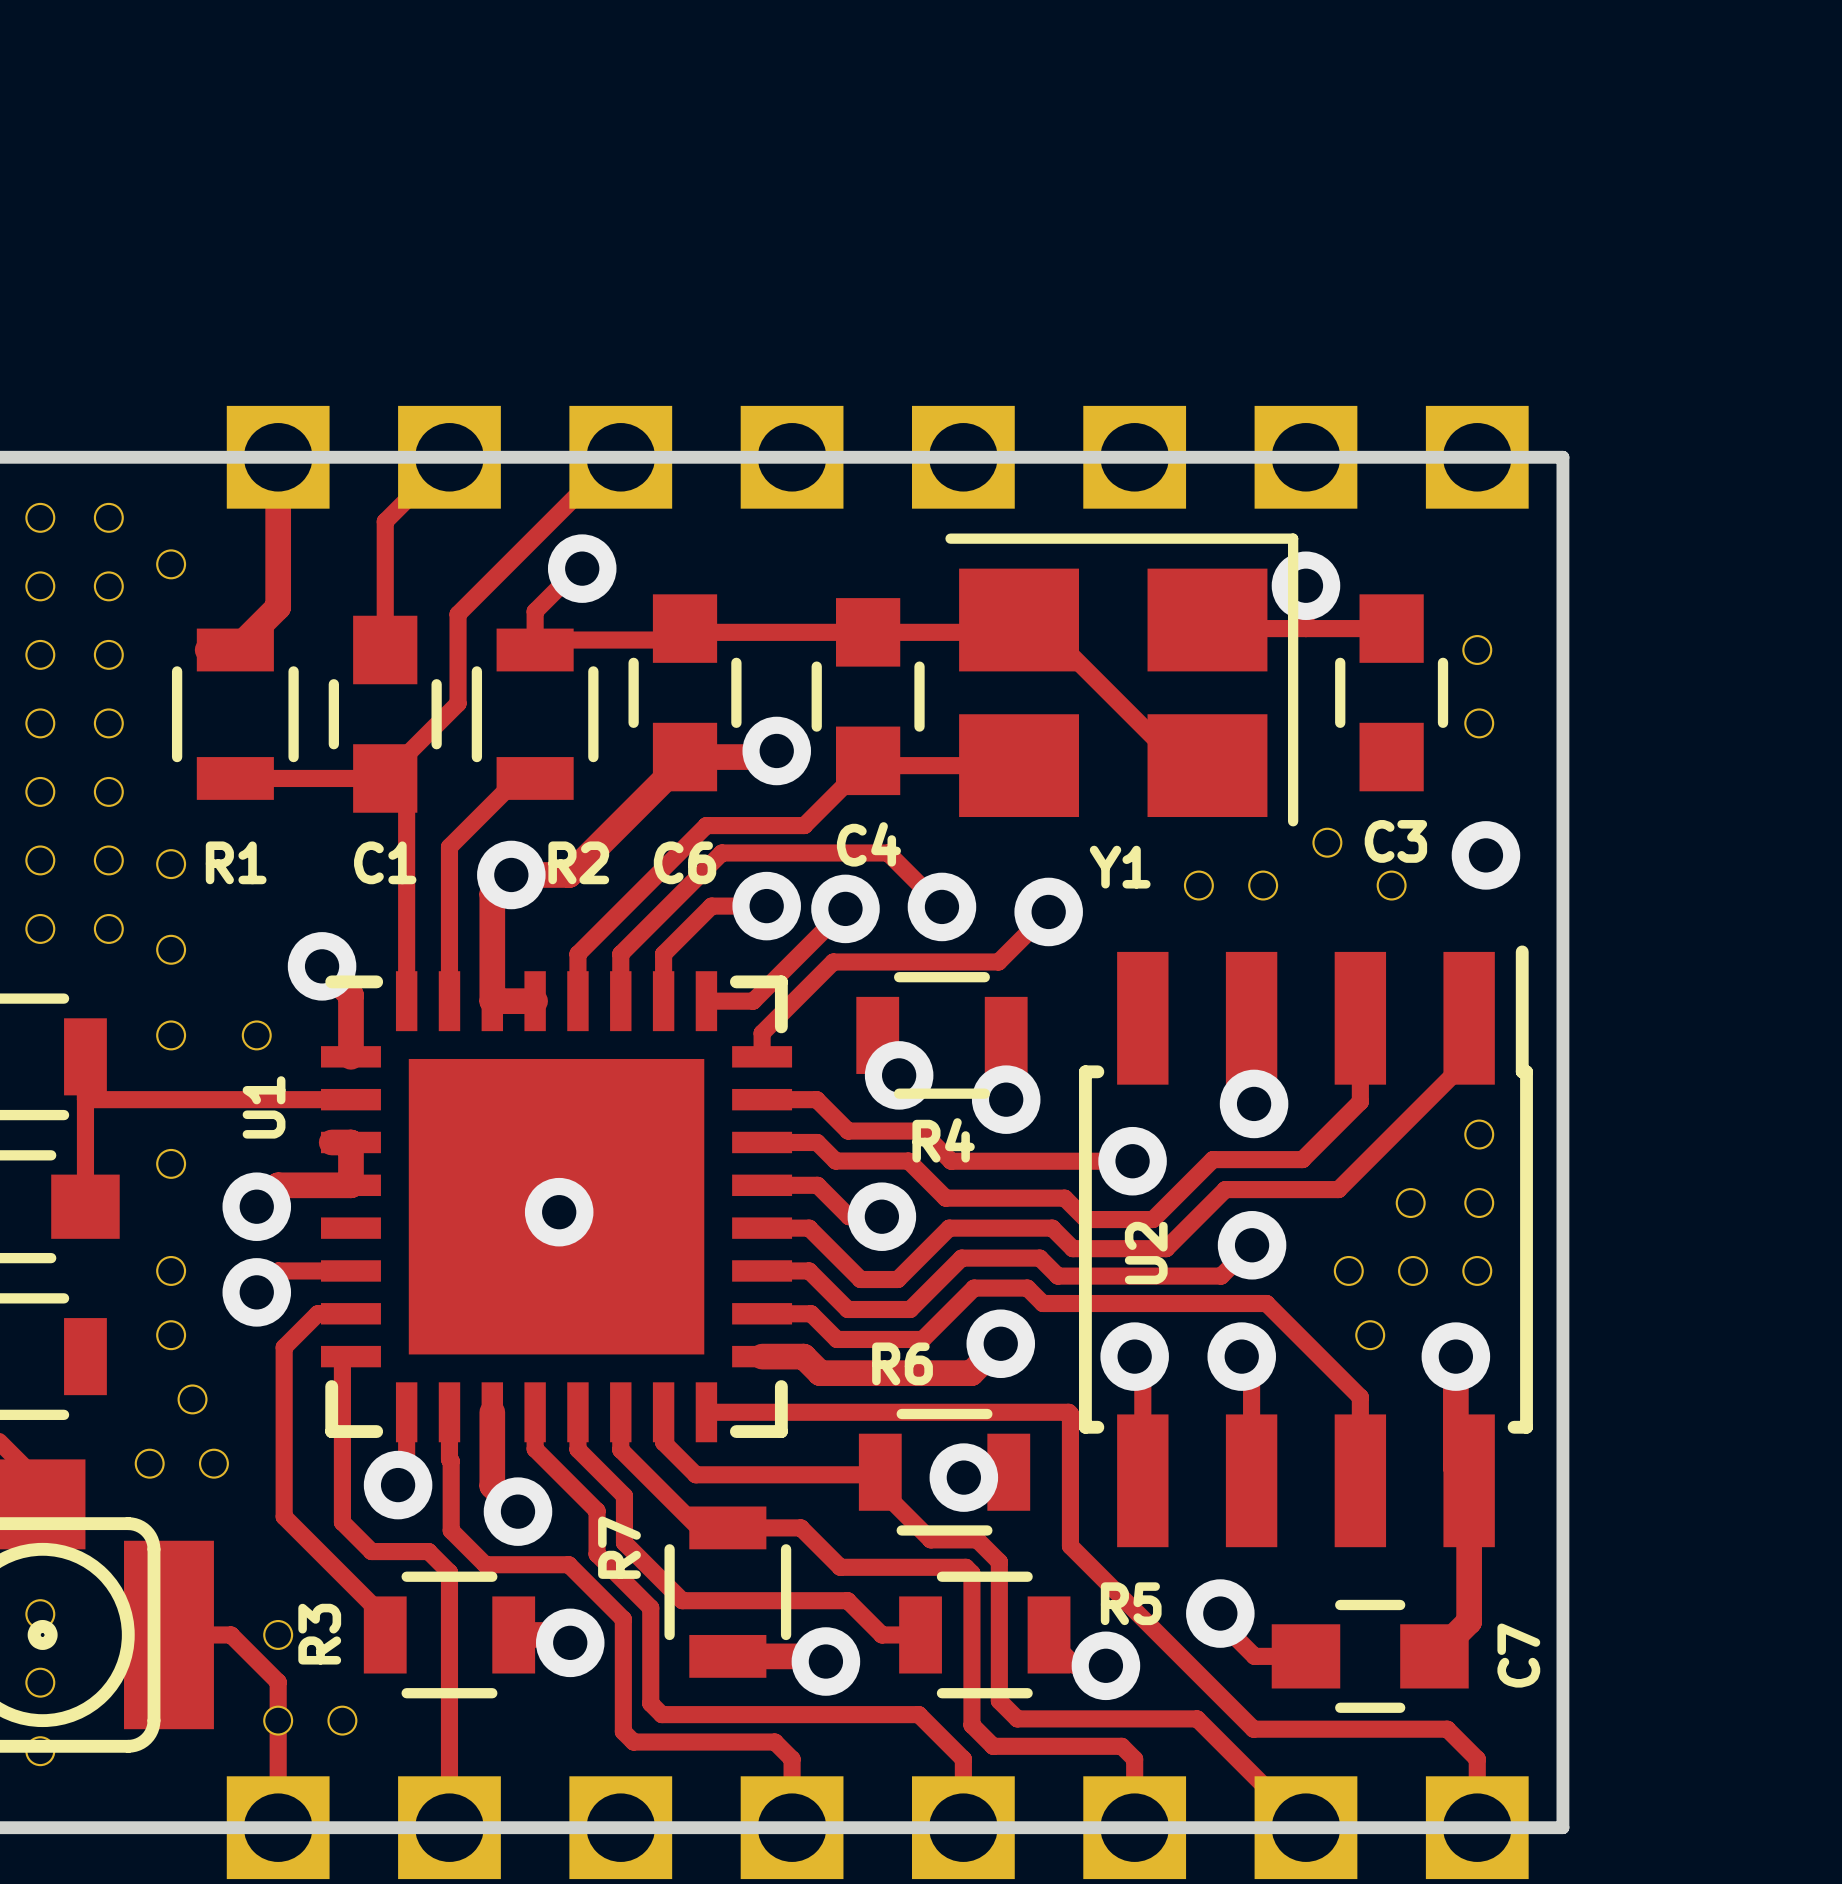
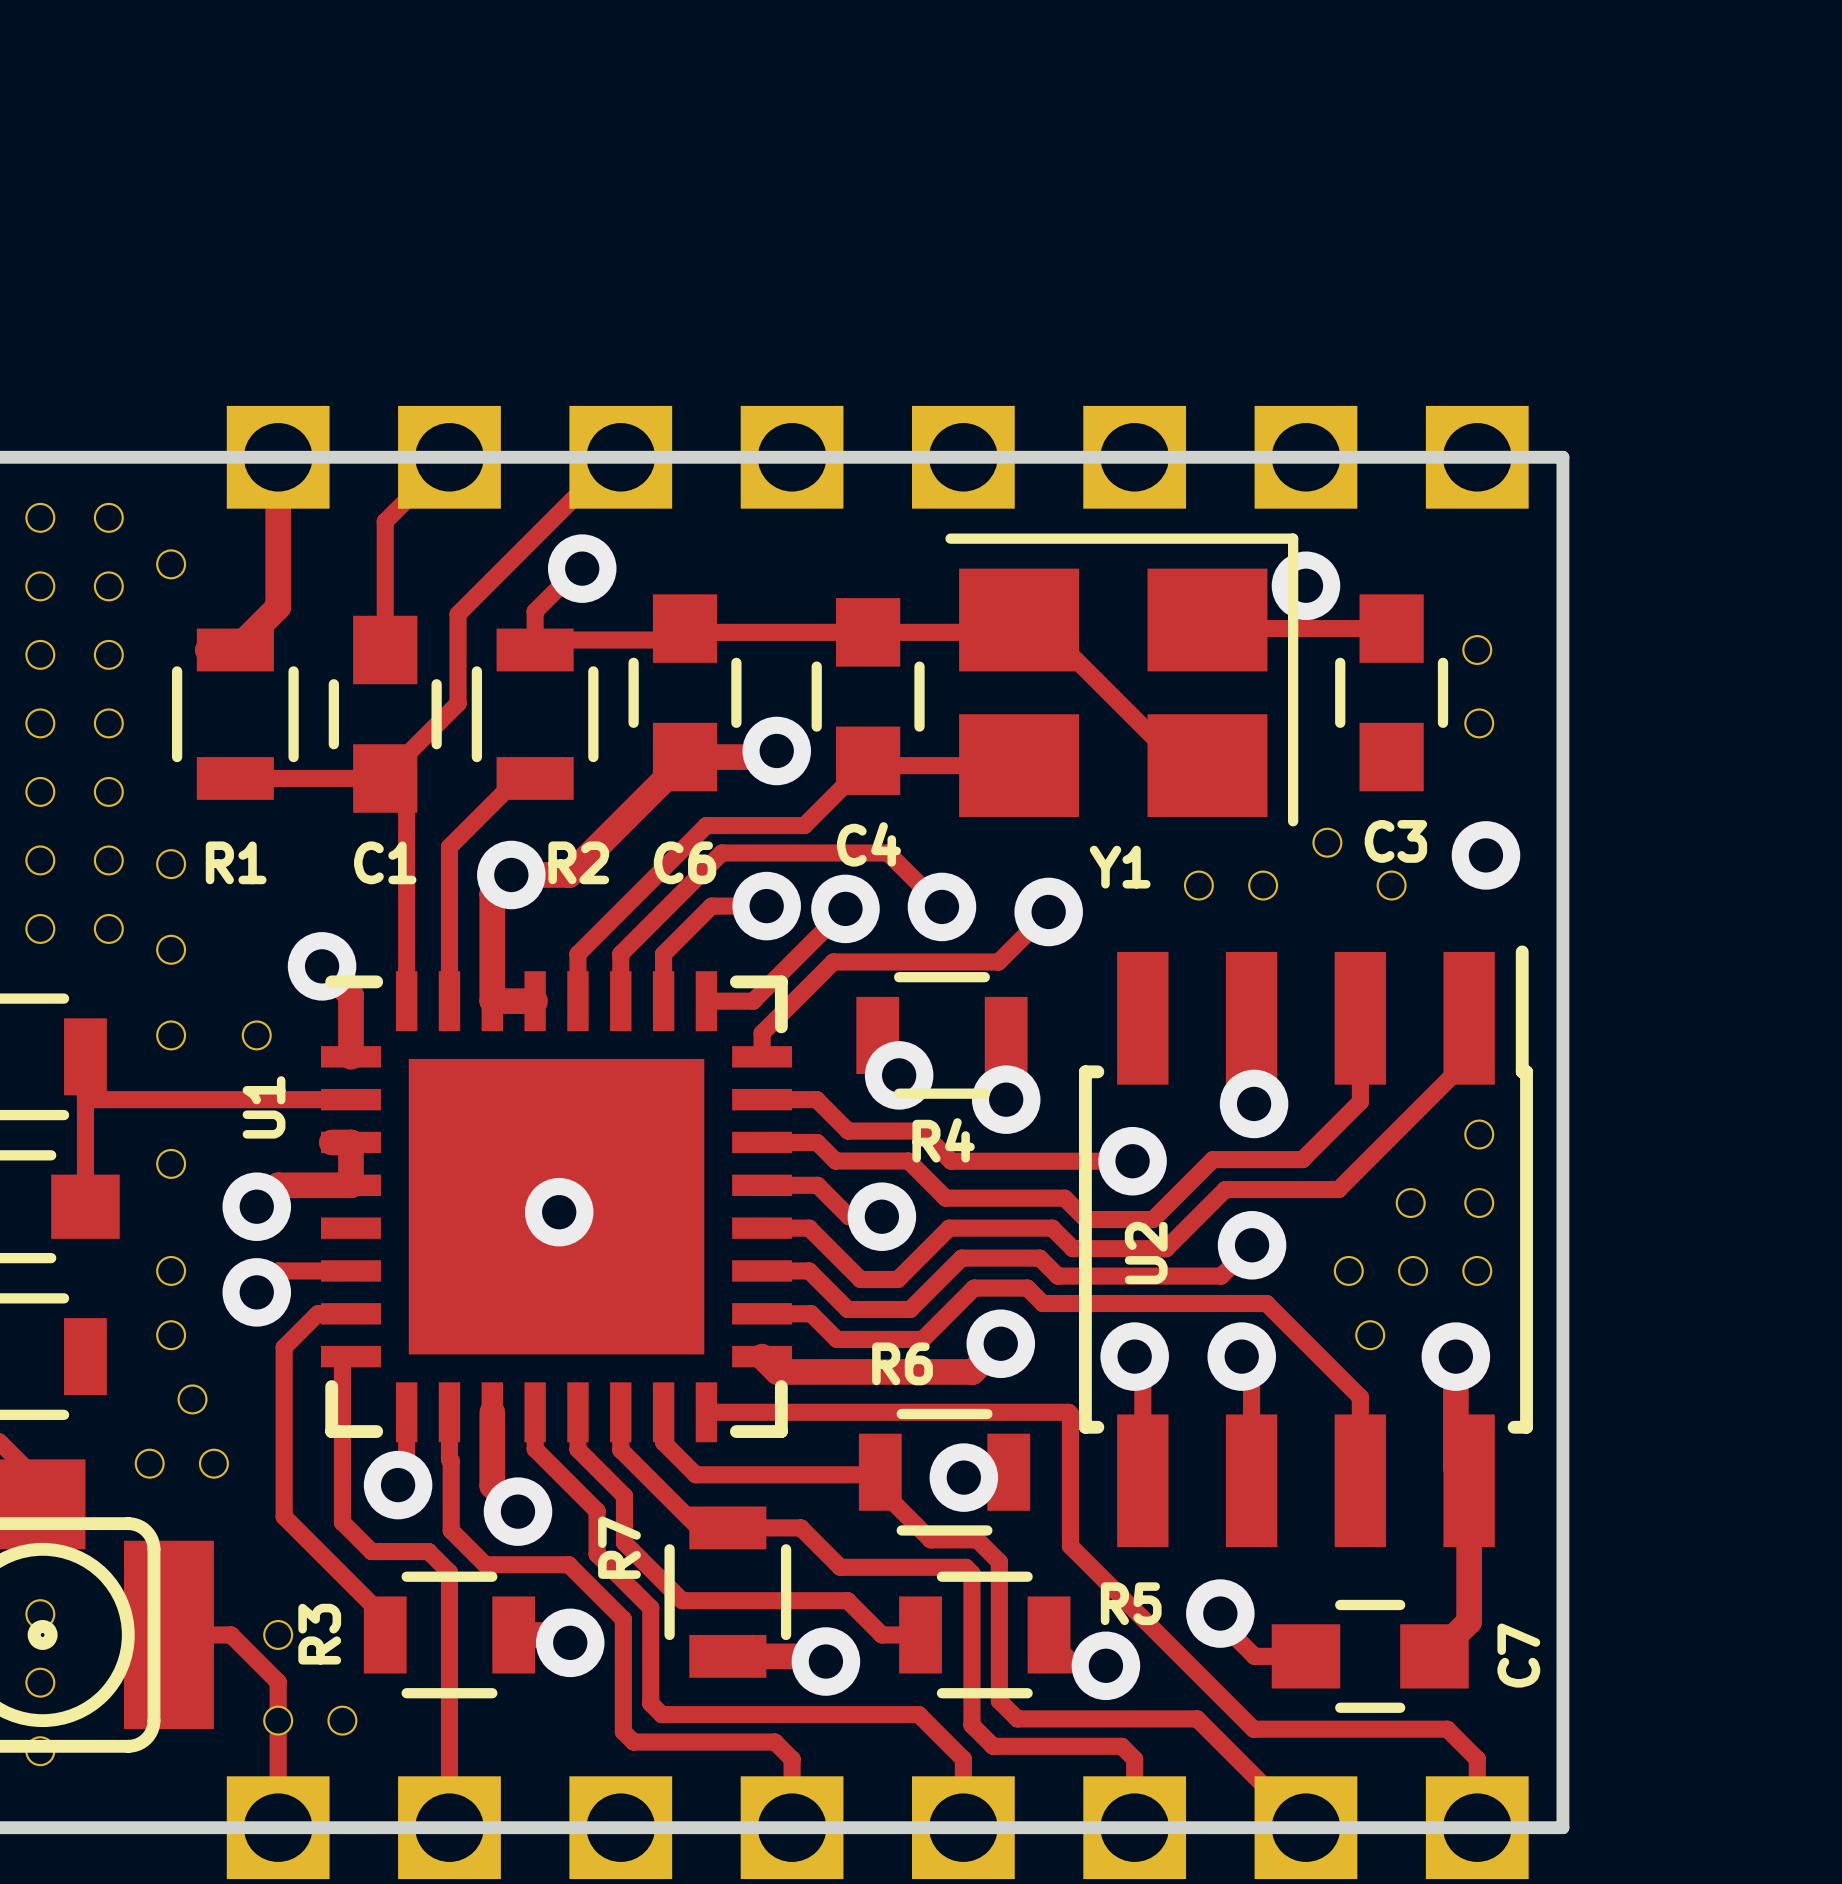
track: (762, 1356) (803, 1356) (820, 1373) (972, 1371) -> (762, 1356) (777, 1371) (972, 1371)

